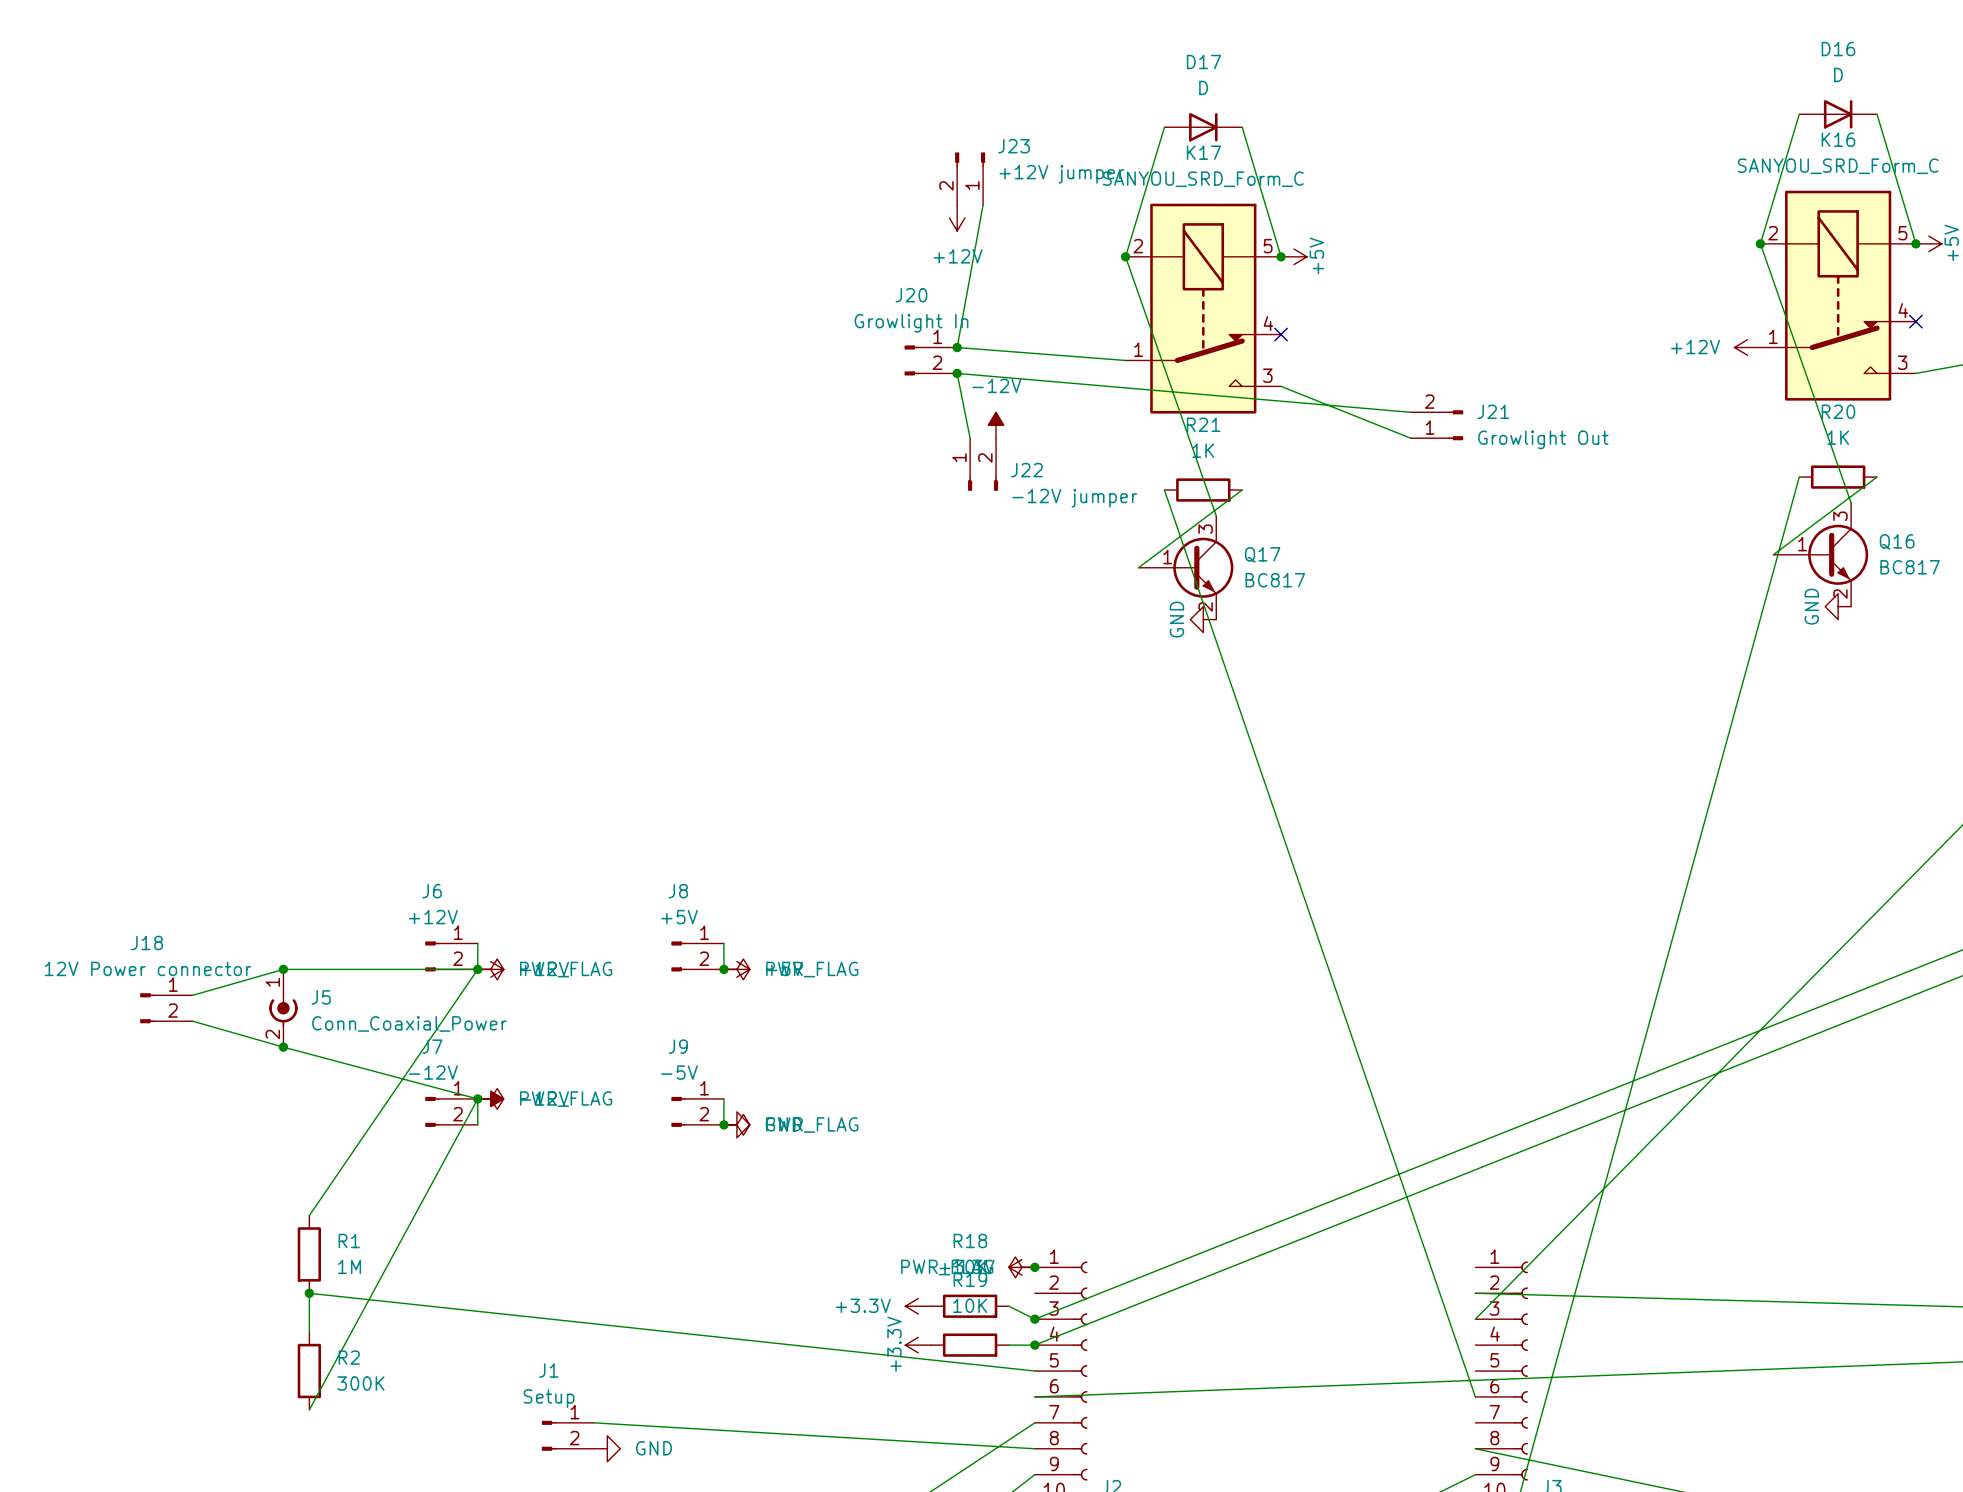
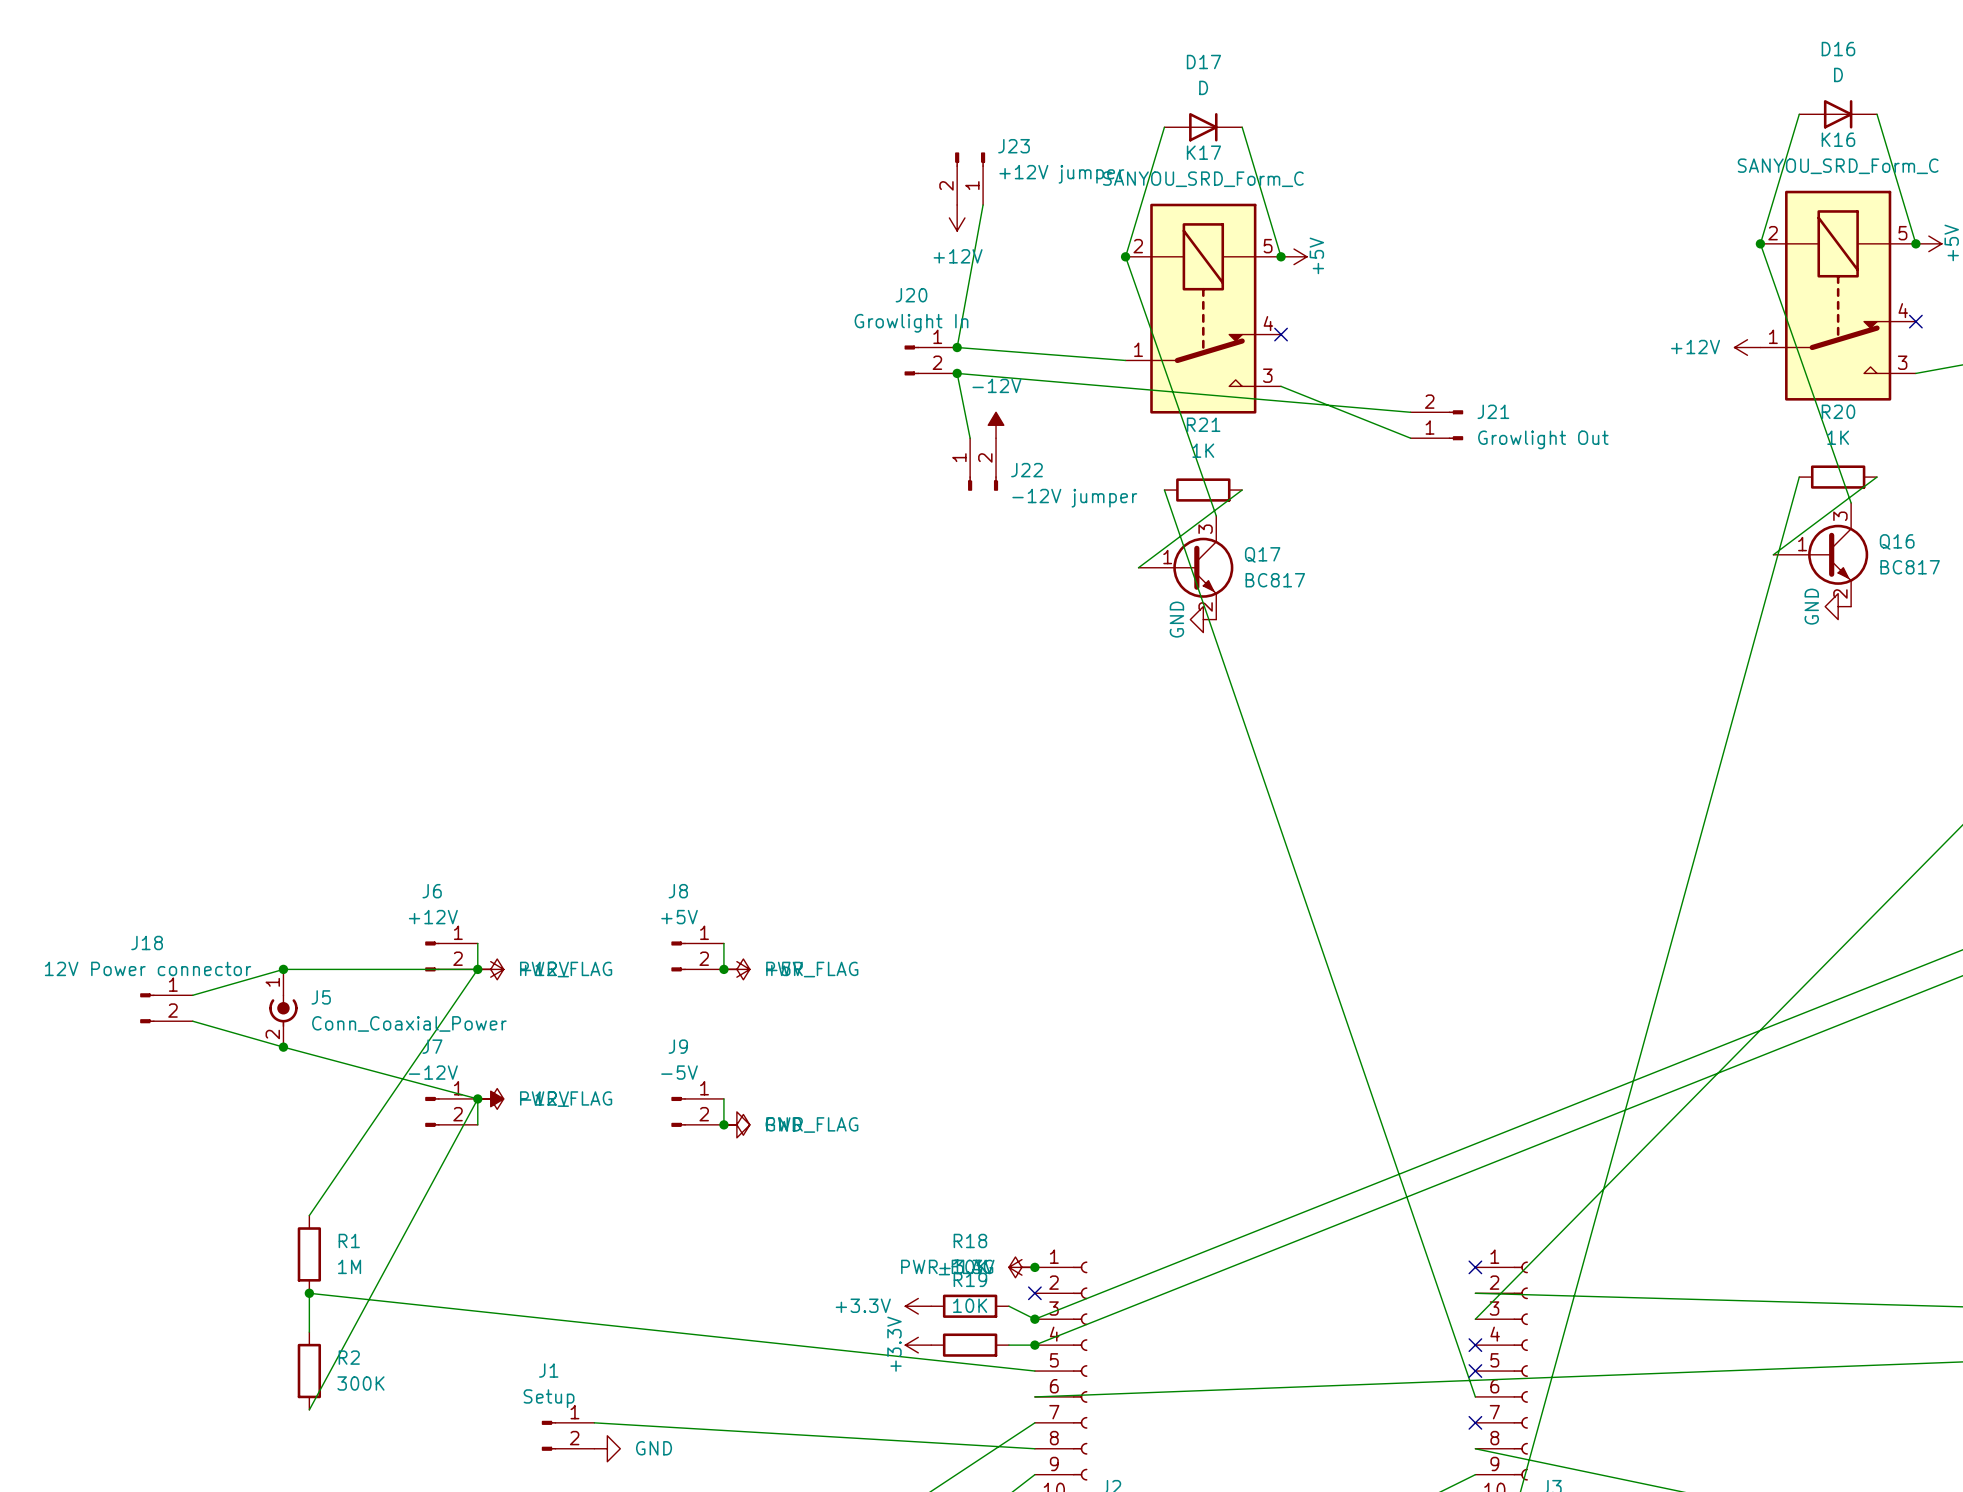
no-connect mark: none -> (1475, 1267)
no-connect mark: none -> (1034, 1293)
no-connect mark: none -> (1475, 1345)
no-connect mark: none -> (1475, 1371)
no-connect mark: none -> (1475, 1422)

